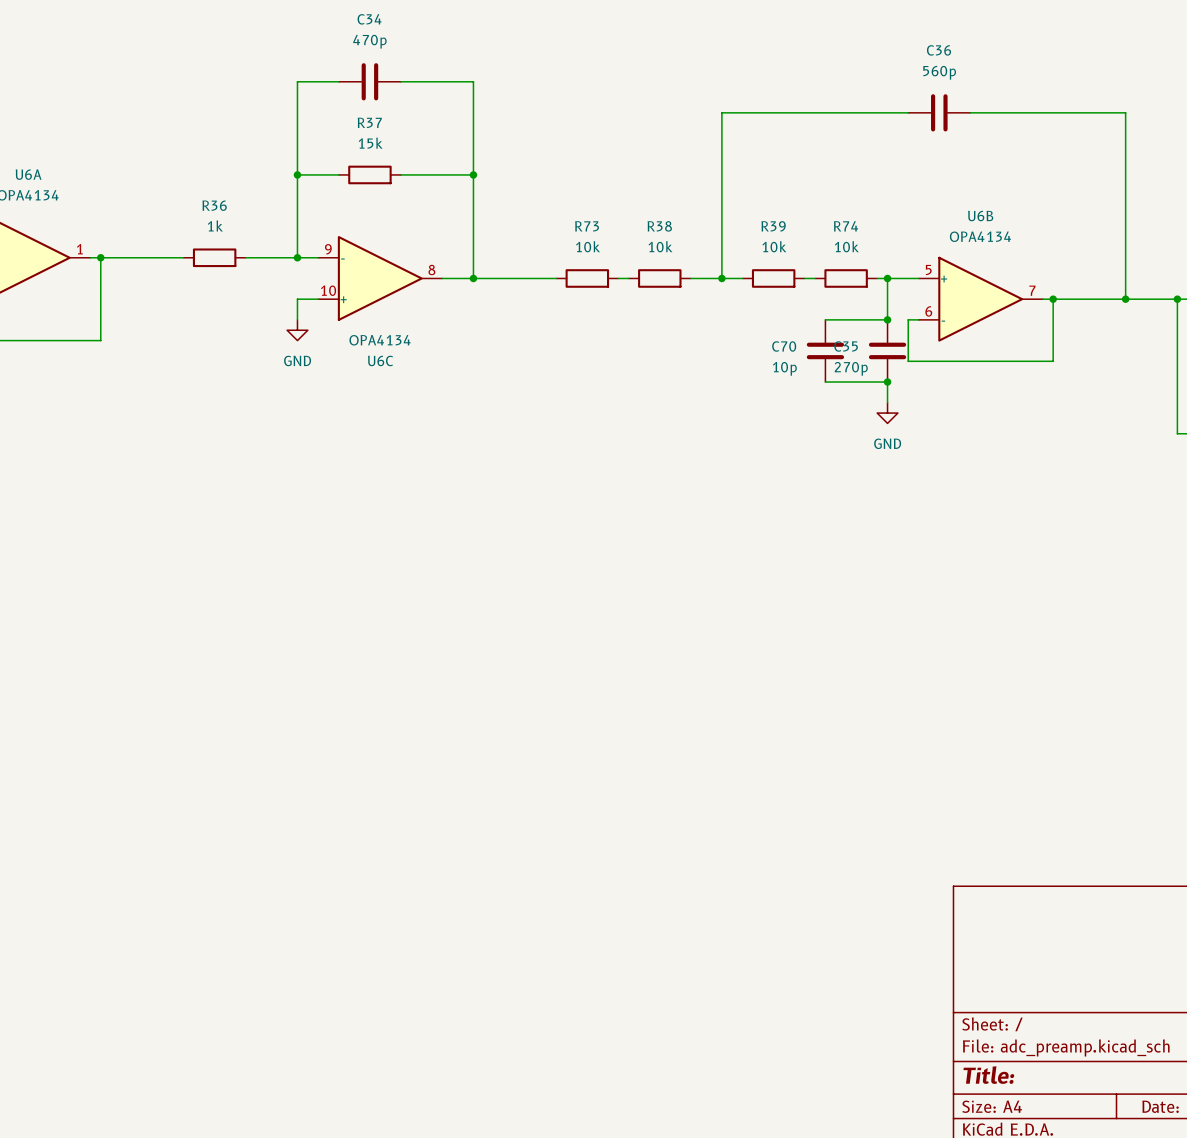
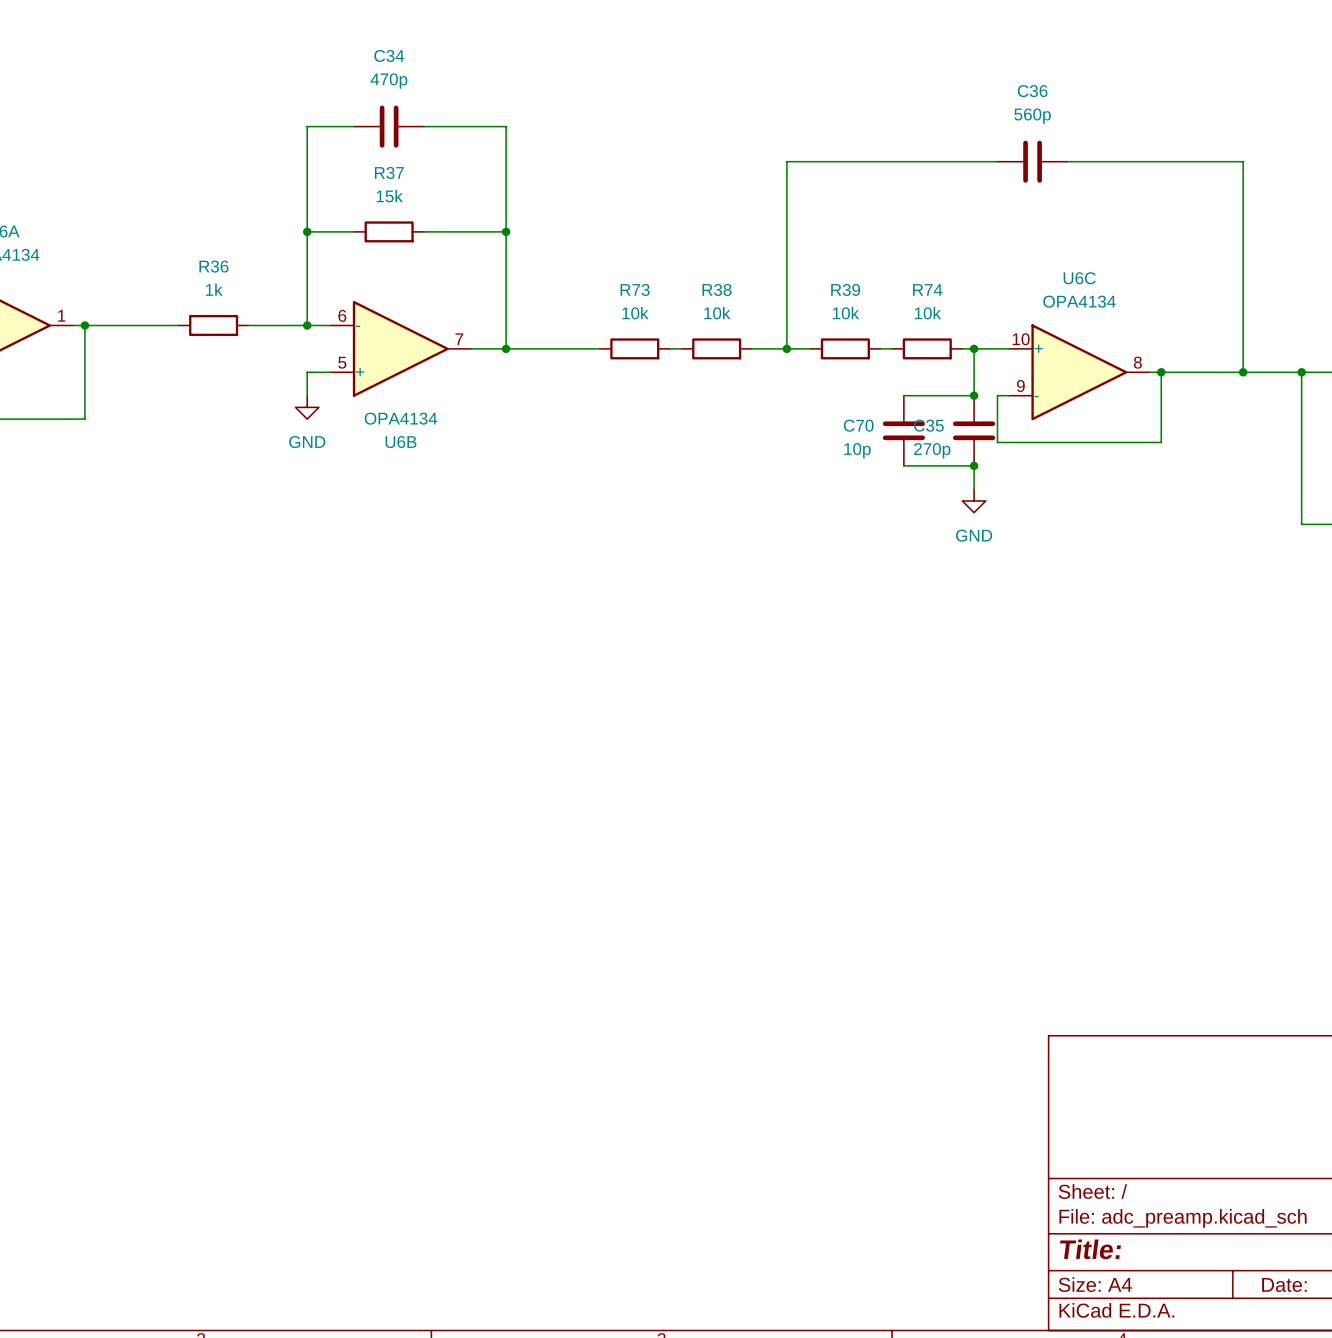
U6C flip: as is (380, 278) -> up-down (1079, 372)
U6C position: (380, 278) -> (1079, 372)
U6B flip: as is (980, 299) -> up-down (400, 348)
U6B position: (980, 299) -> (400, 348)

